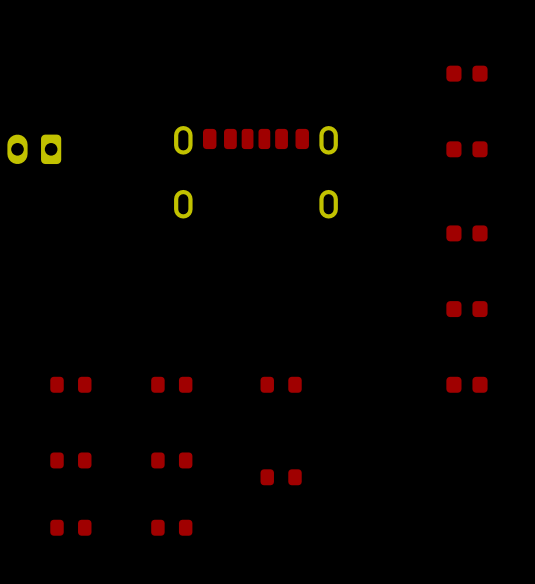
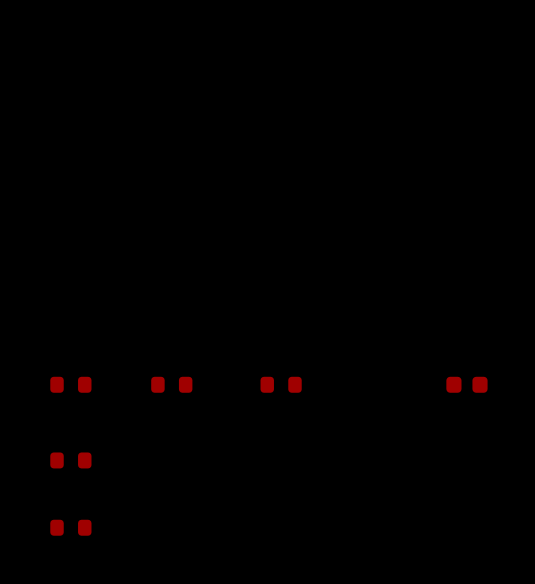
part: (466, 73) -> none
part: (34, 149) -> none
part: (466, 149) -> none
part: (255, 172) -> none
part: (466, 233) -> none
part: (466, 309) -> none
part: (171, 460) -> none
part: (281, 477) -> none
part: (171, 527) -> none

